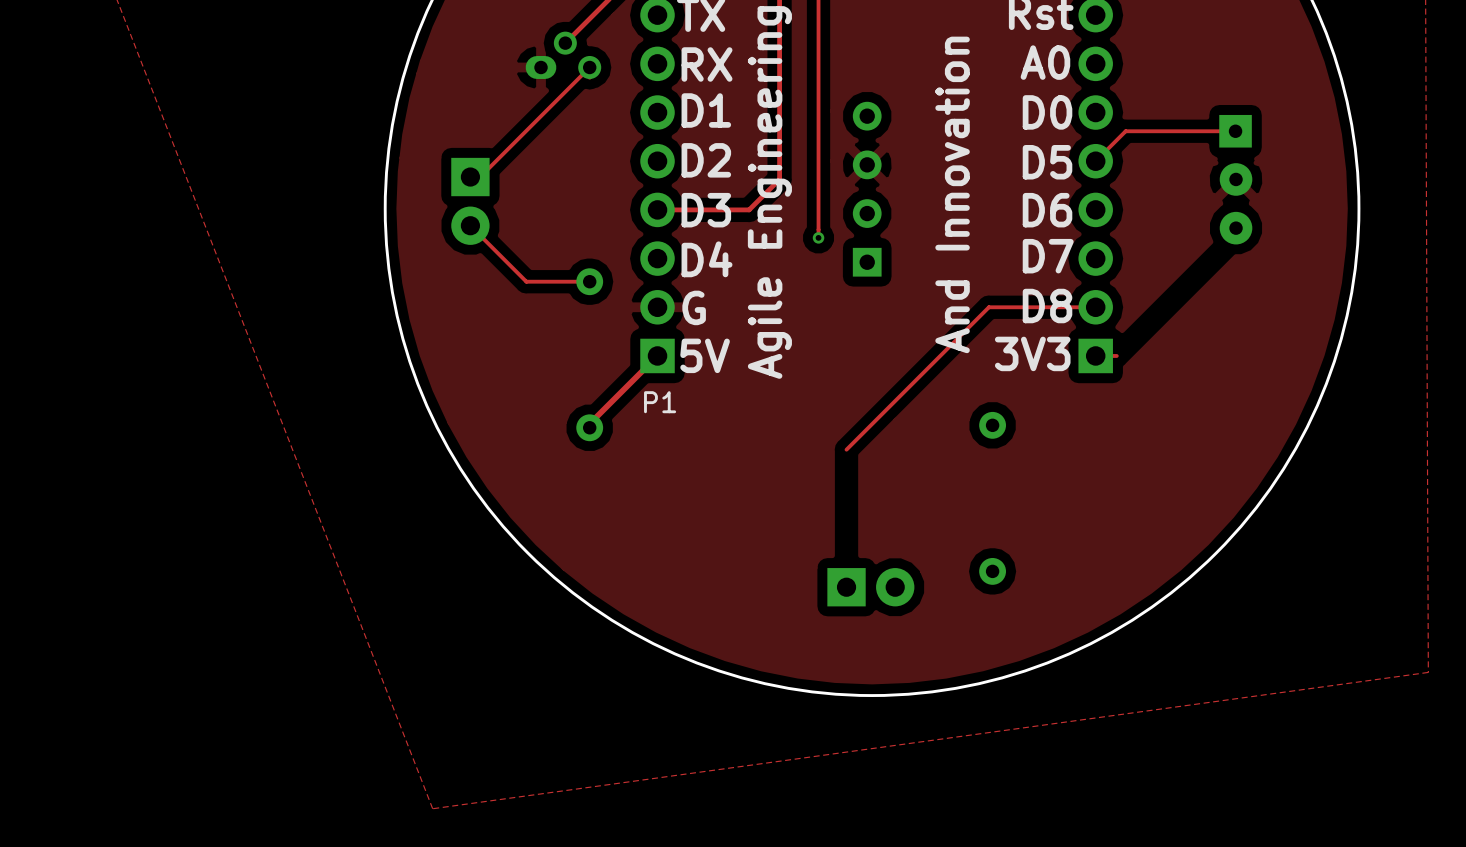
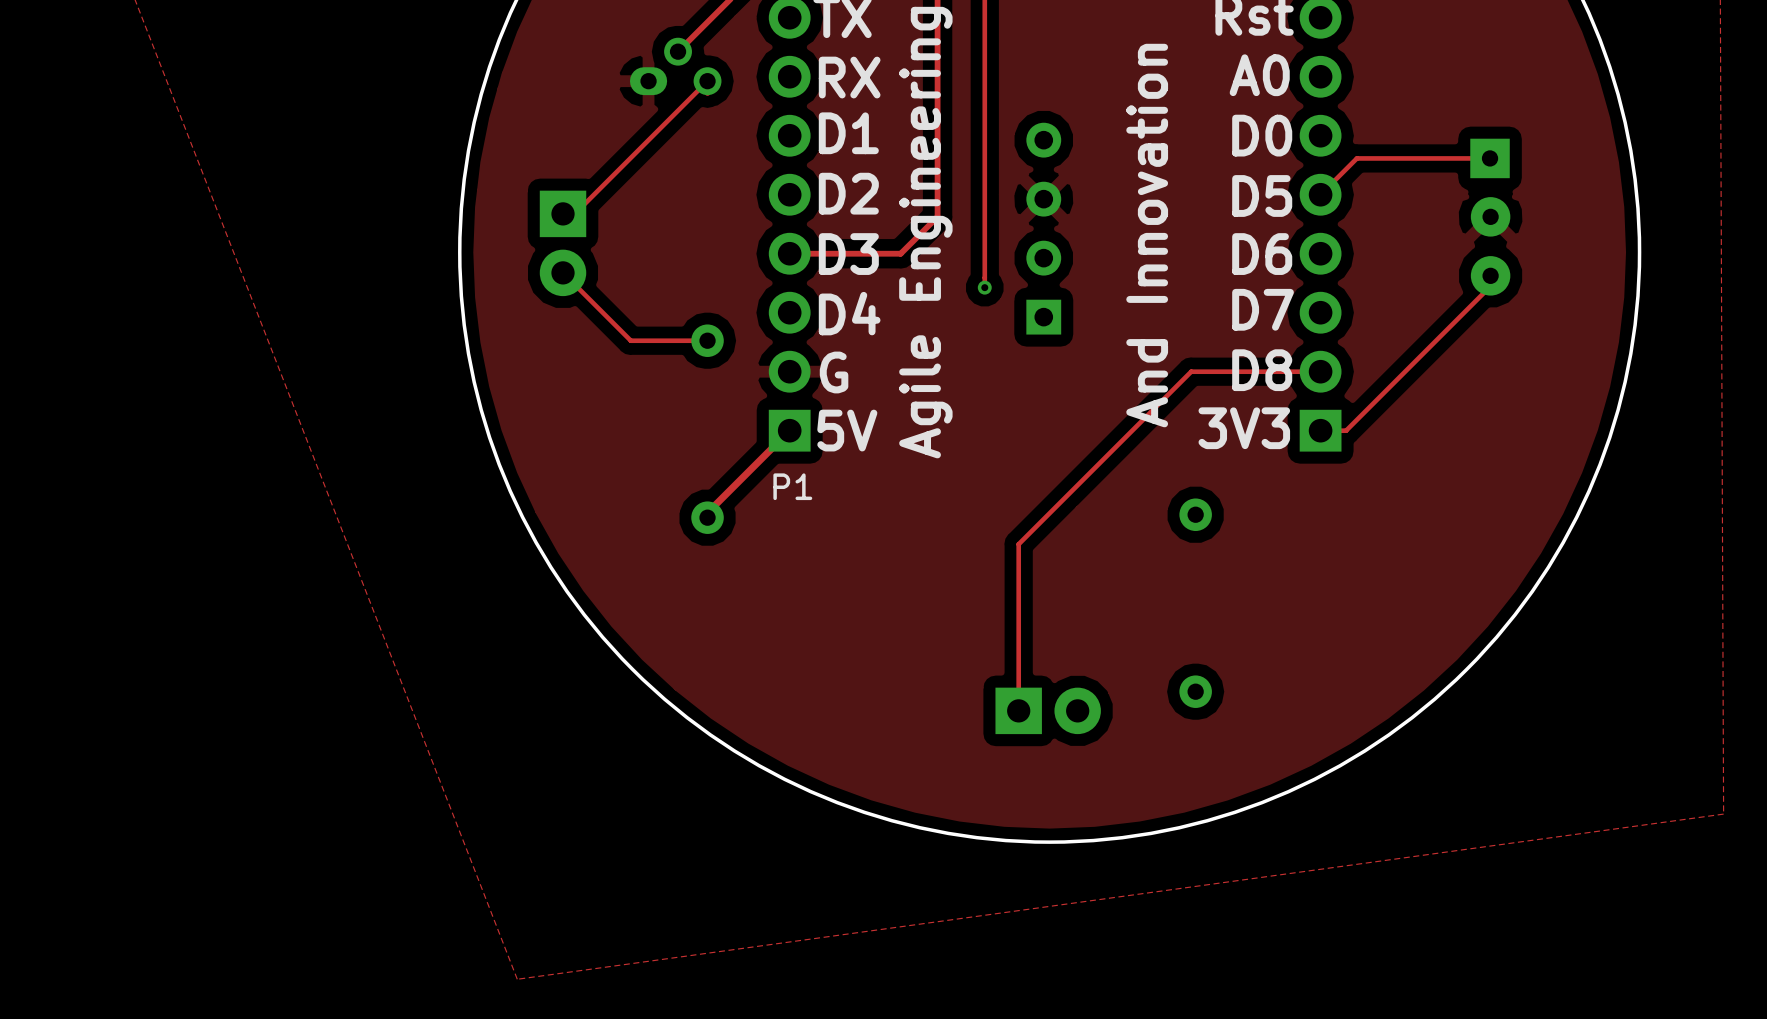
track: none -> (1490, 275) (1490, 286) (1346, 430)
track: none -> (1018, 544) (1018, 710)

